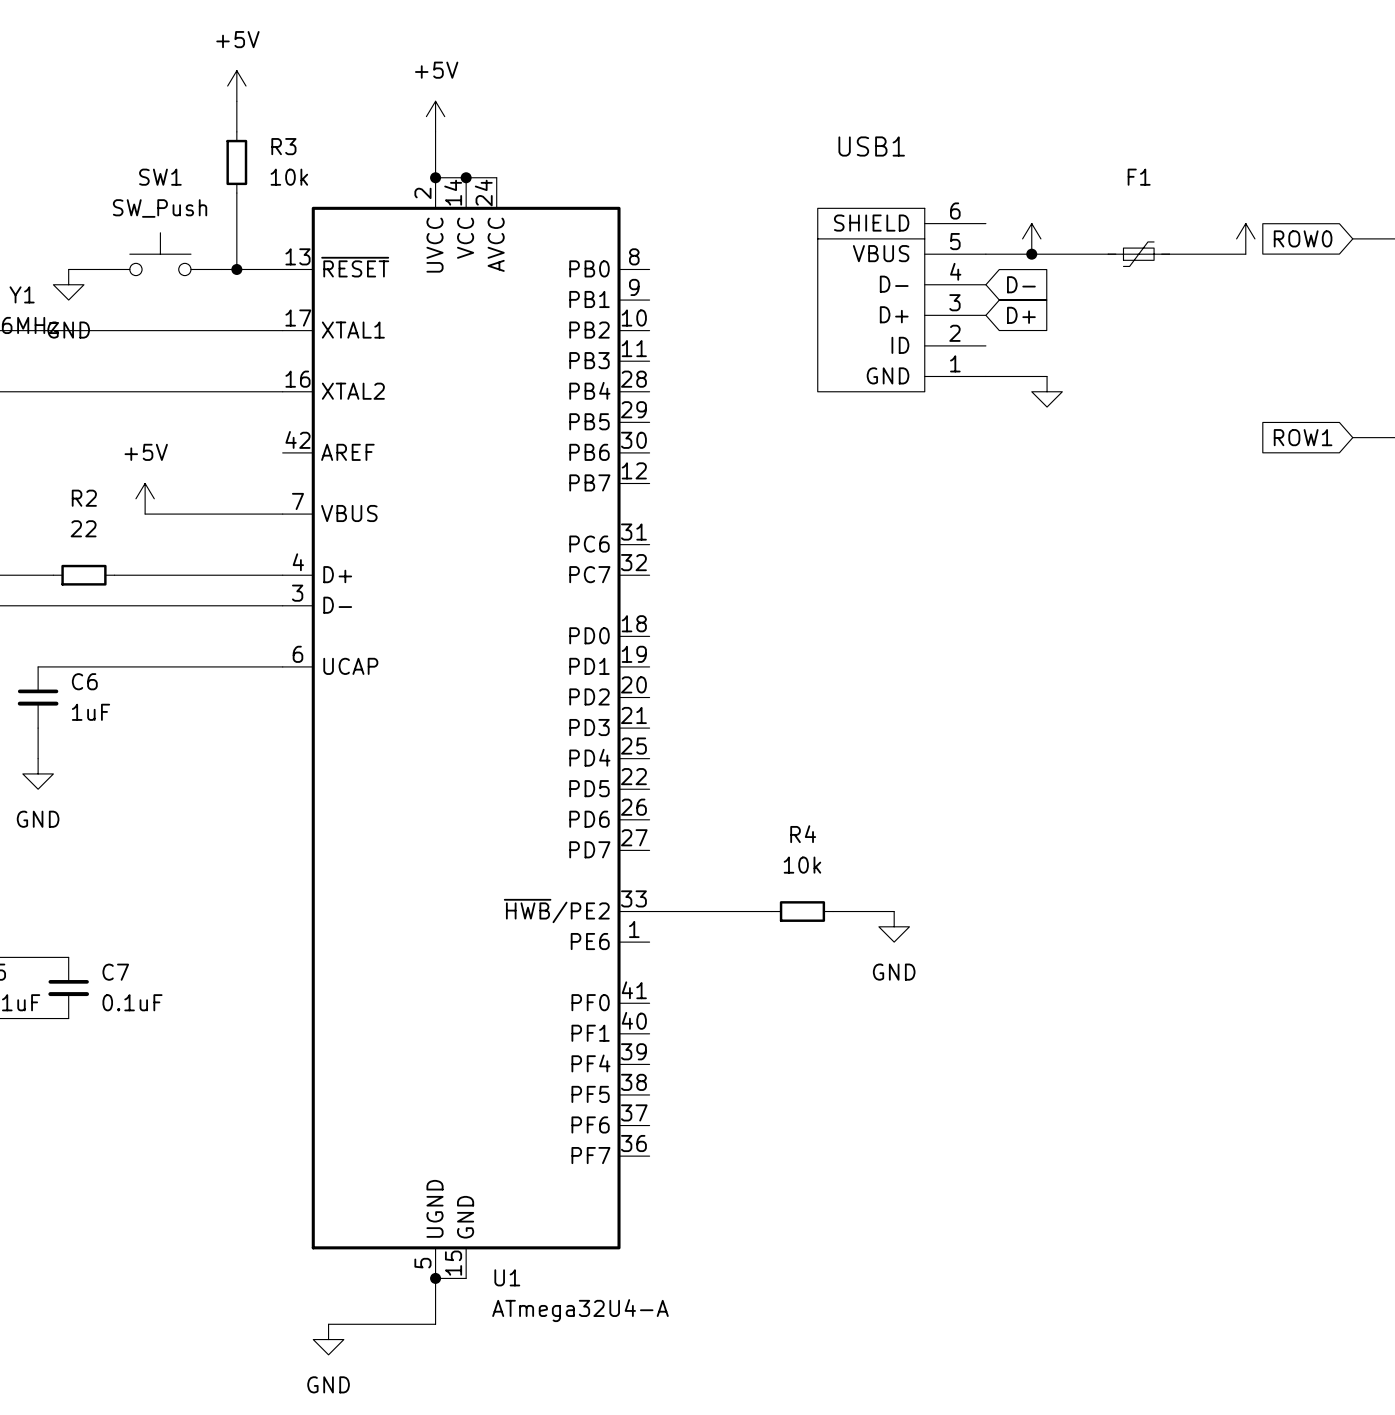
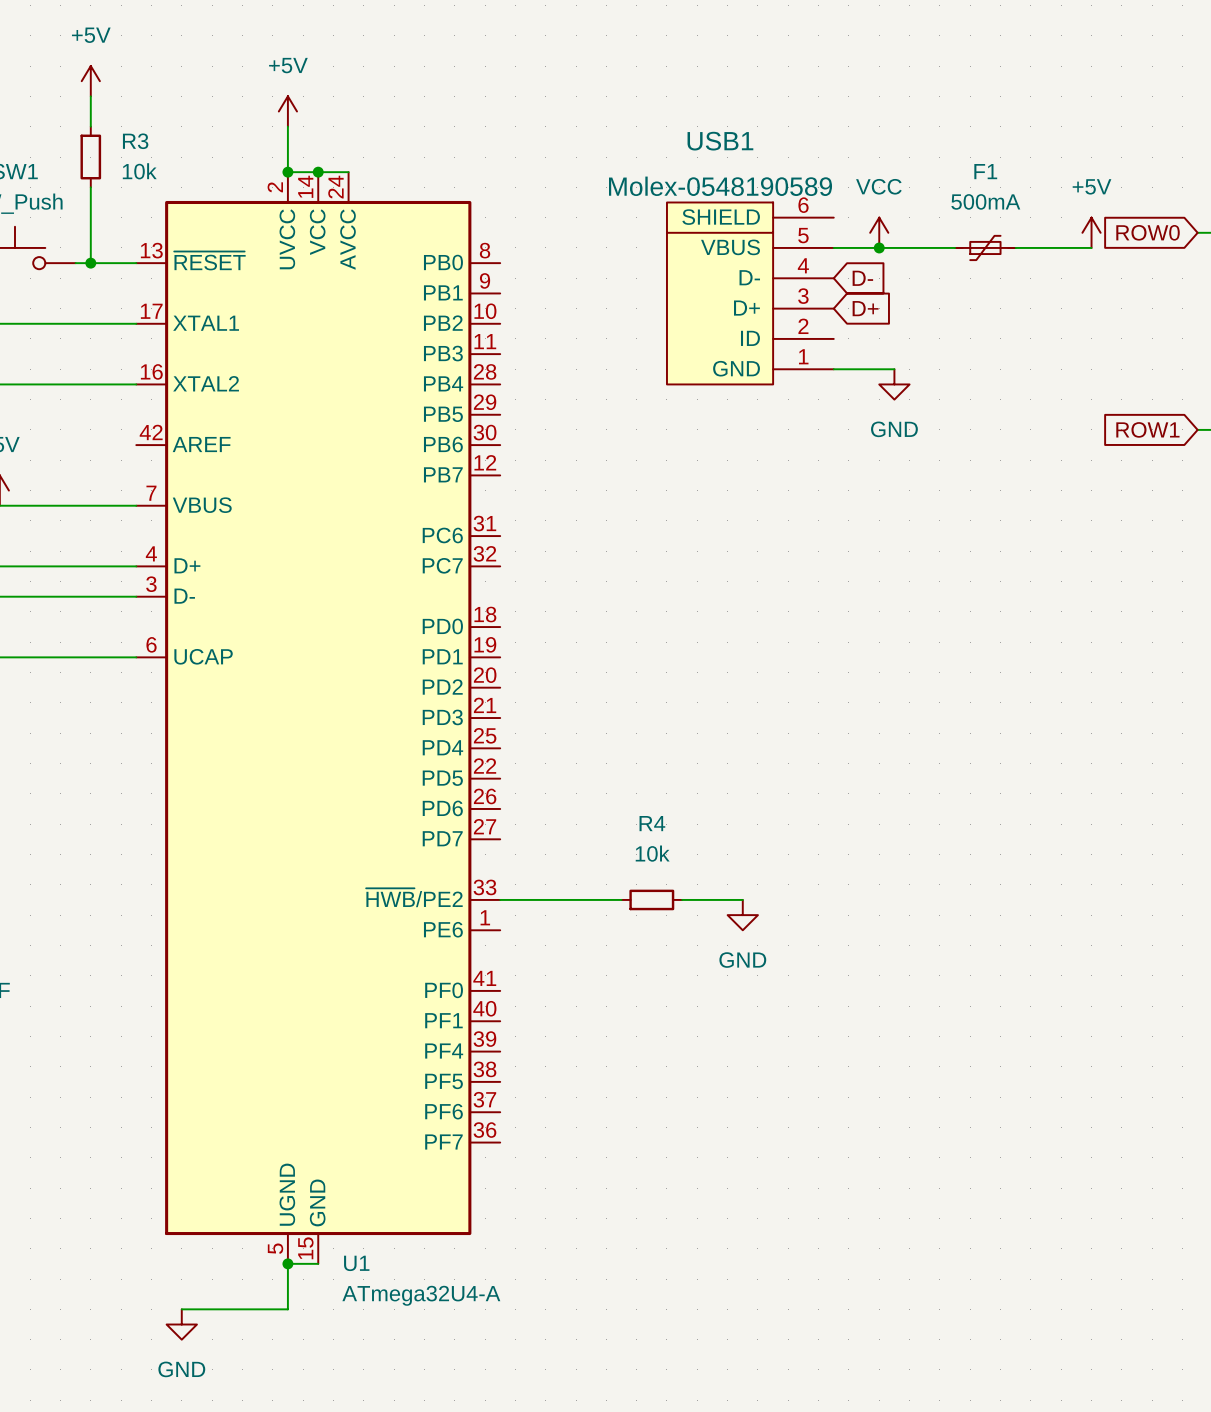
USB1 value: none -> Molex-0548190589 (720, 186)
power symbol text: none -> VCC (878, 186)
power symbol text: none -> +5V (1092, 186)
F1 value: none -> 500mA (985, 201)
power symbol text: none -> GND (894, 429)

